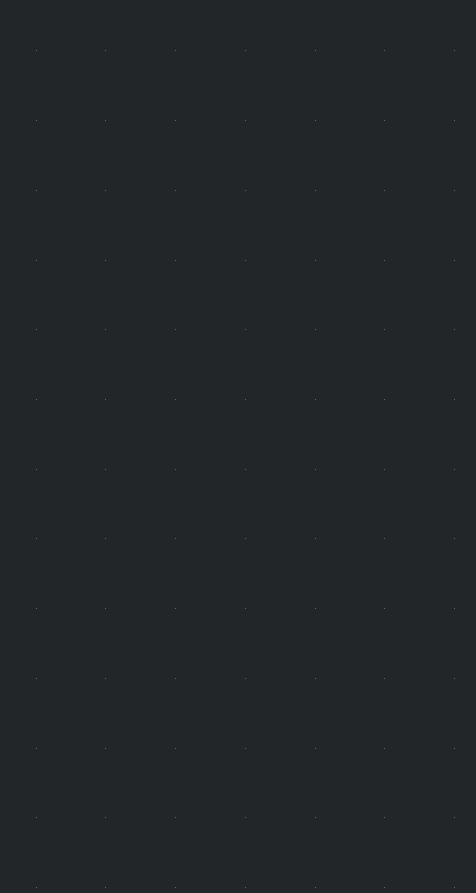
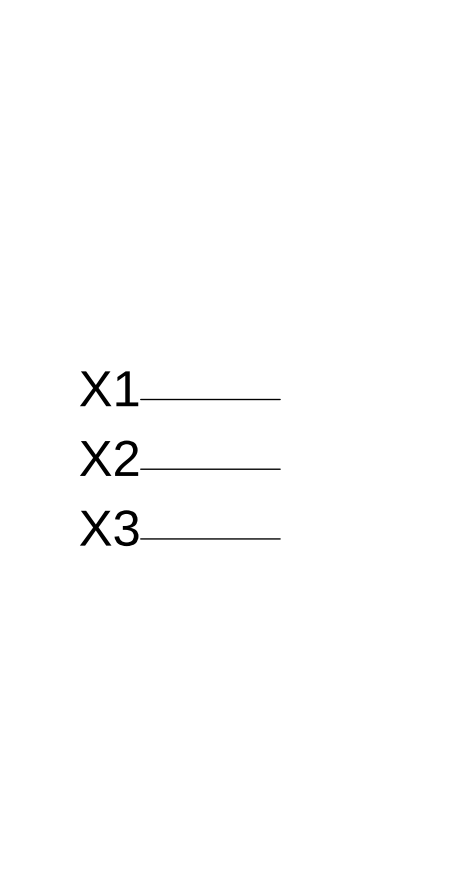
label: none -> X1 (109, 388)
wire: none -> (140, 399) (280, 399)
label: none -> X2 (109, 458)
wire: none -> (140, 469) (280, 469)
label: none -> X3 (109, 528)
wire: none -> (140, 538) (280, 538)

